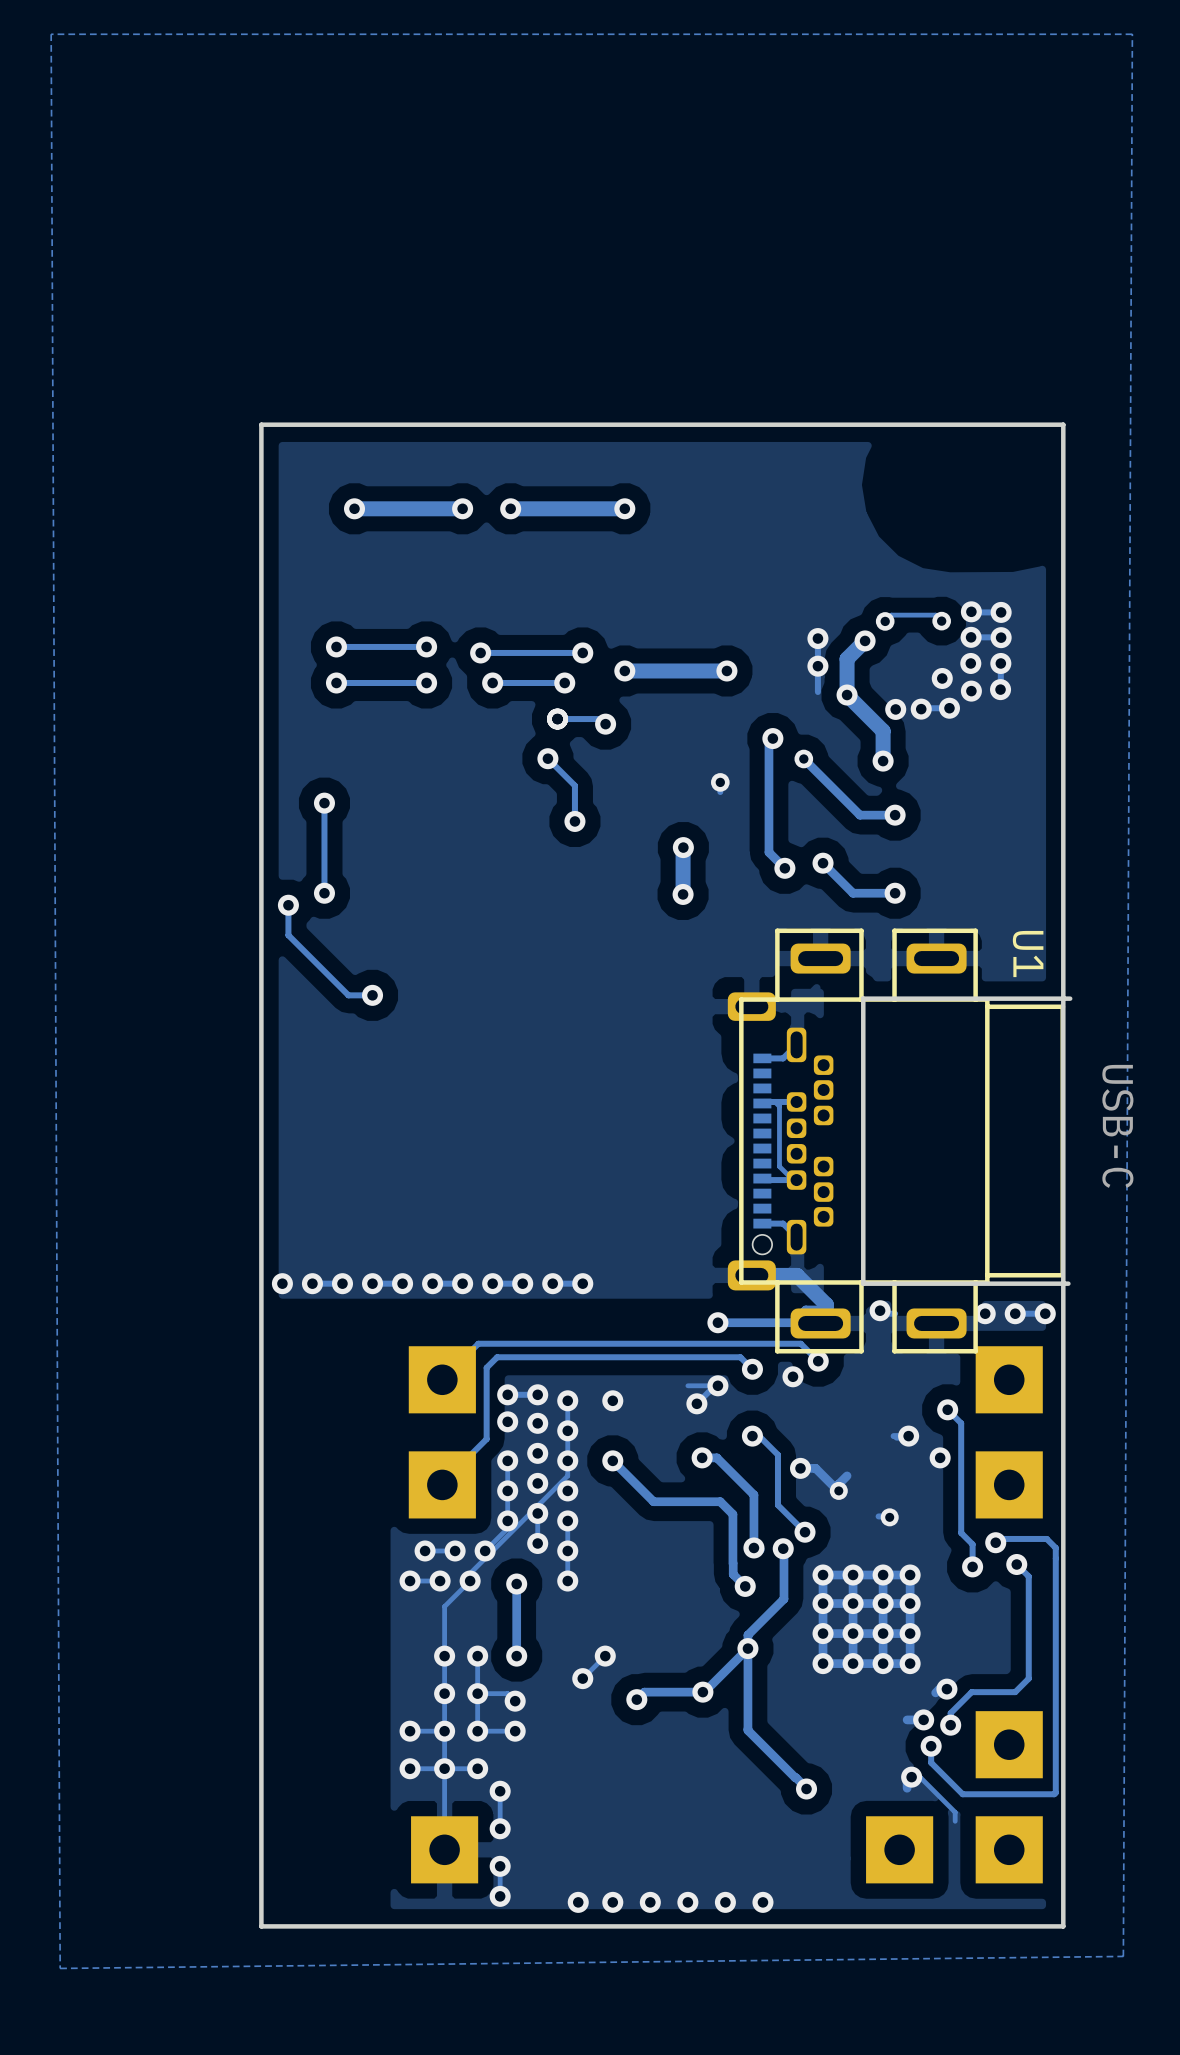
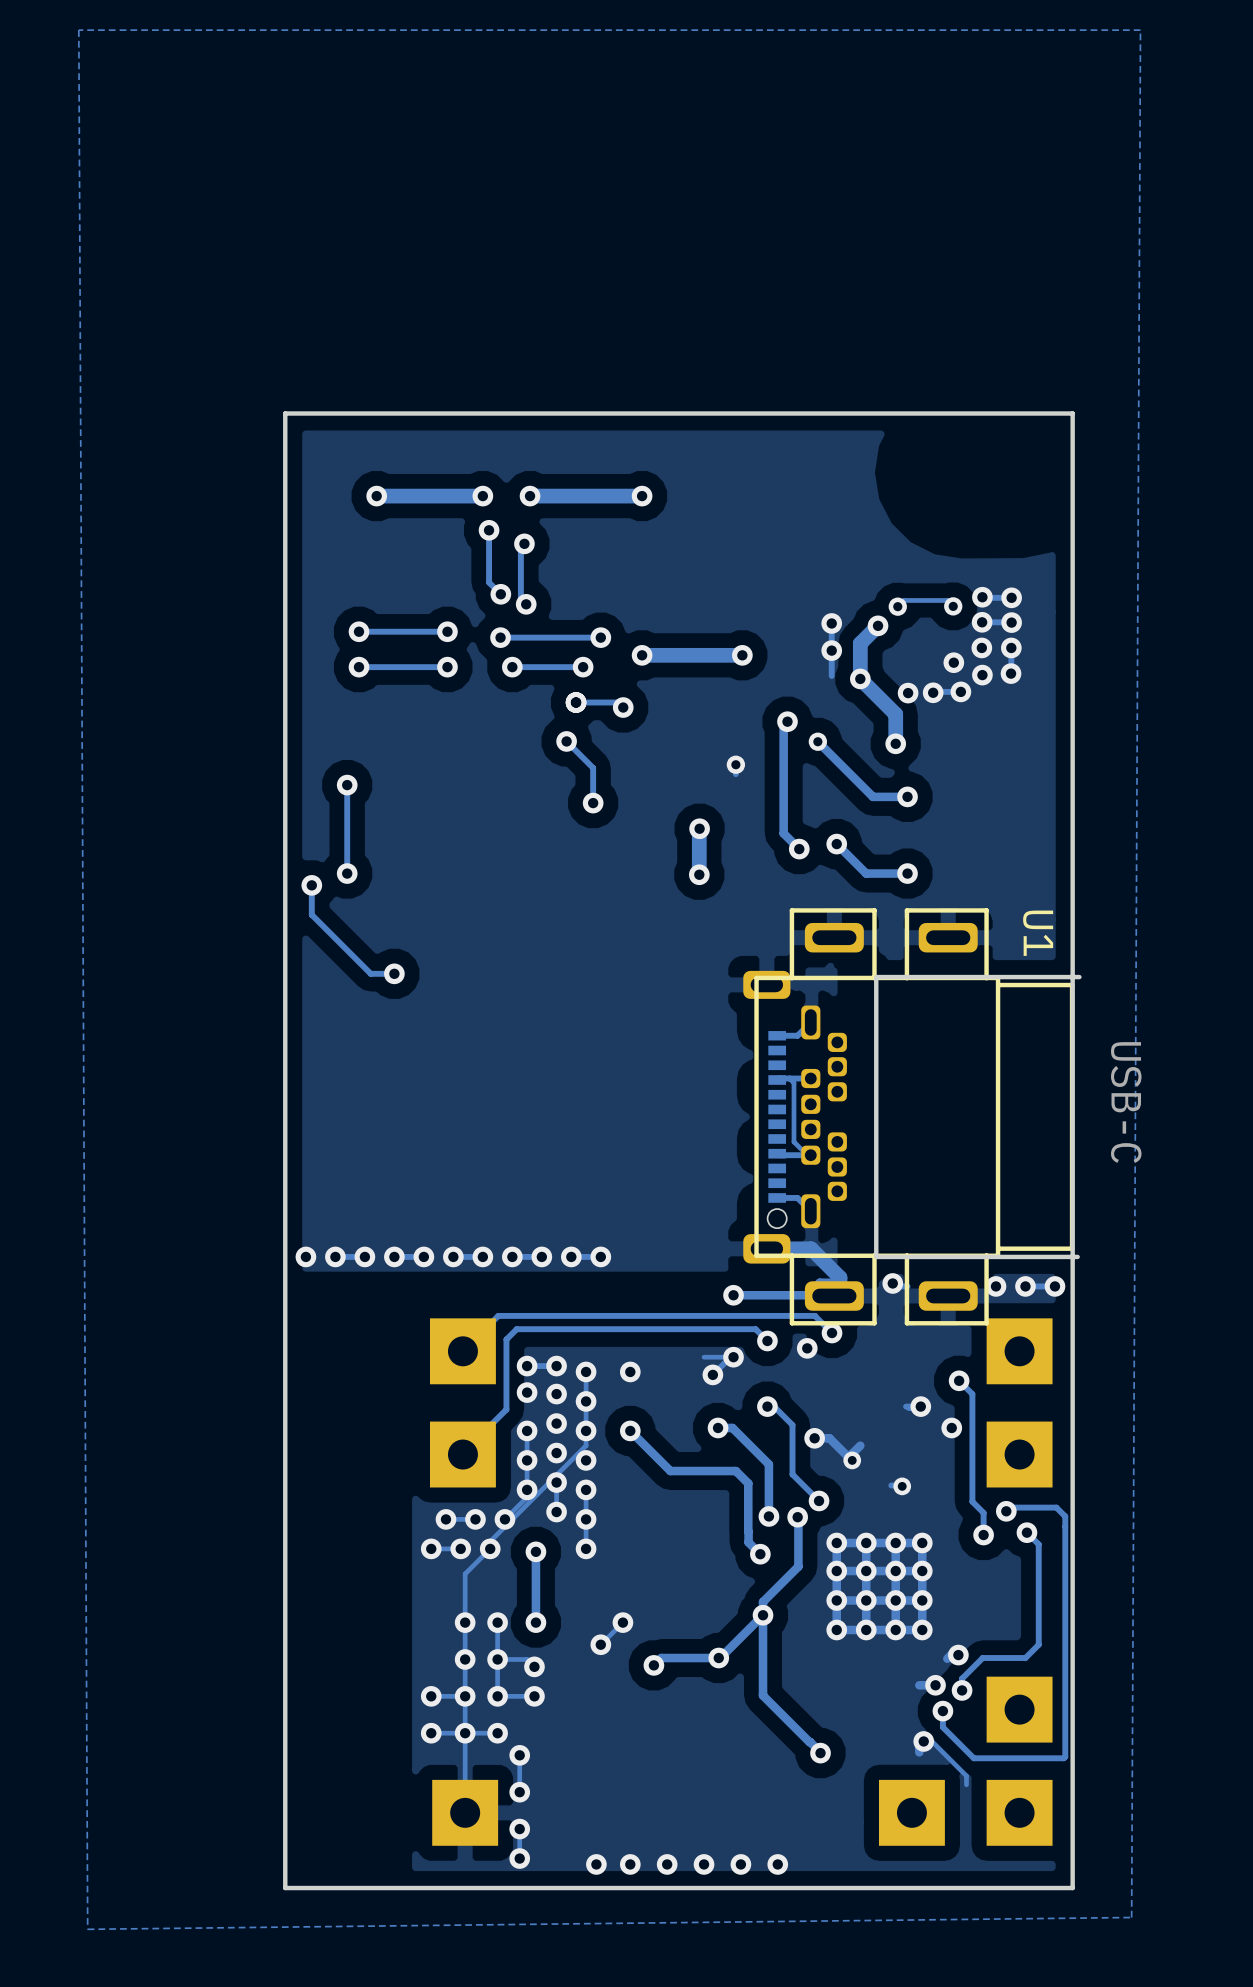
track: none -> (489, 530) (489, 582) (500, 594)
via: none -> (489, 530)
track: none -> (524, 543) (520, 547) (520, 599) (526, 604)
via: none -> (524, 543)
via: none -> (500, 594)
via: none -> (526, 604)

